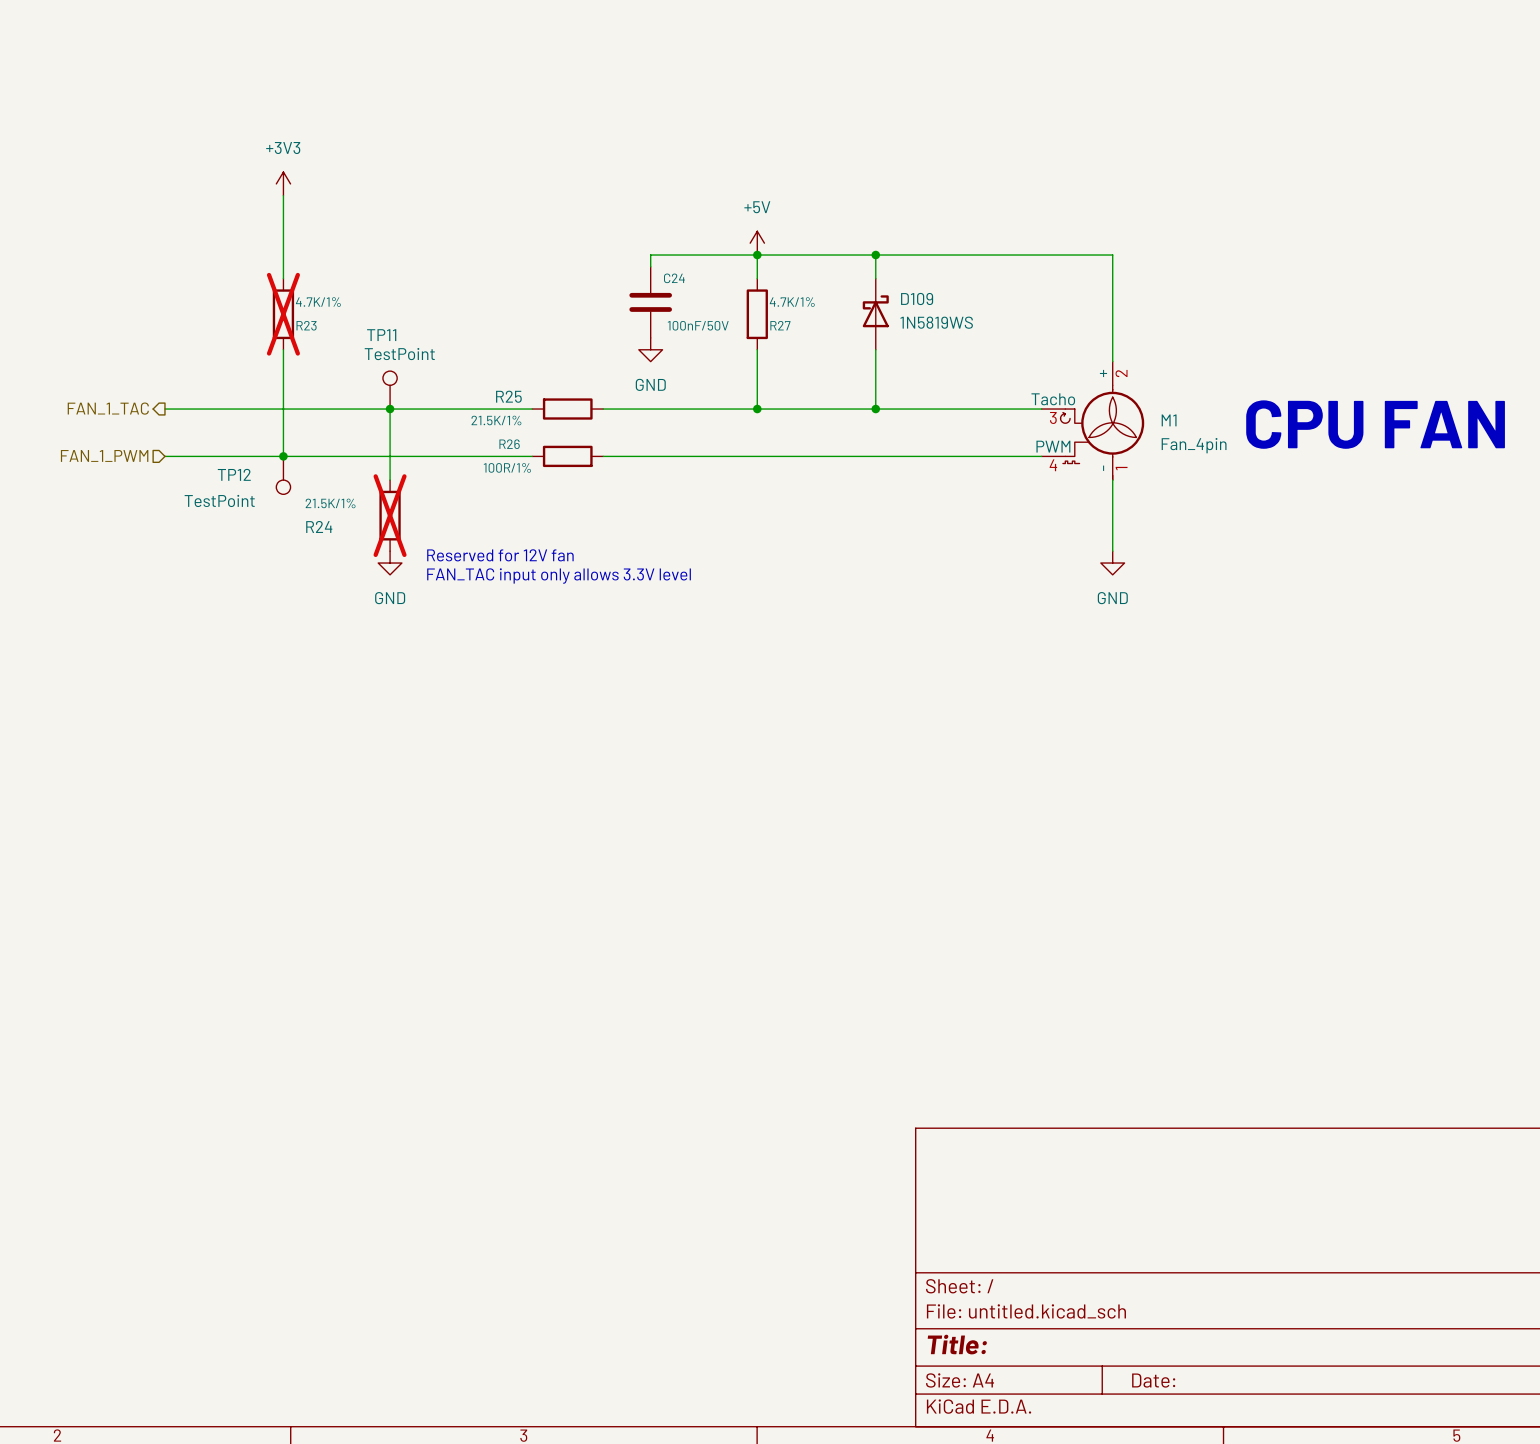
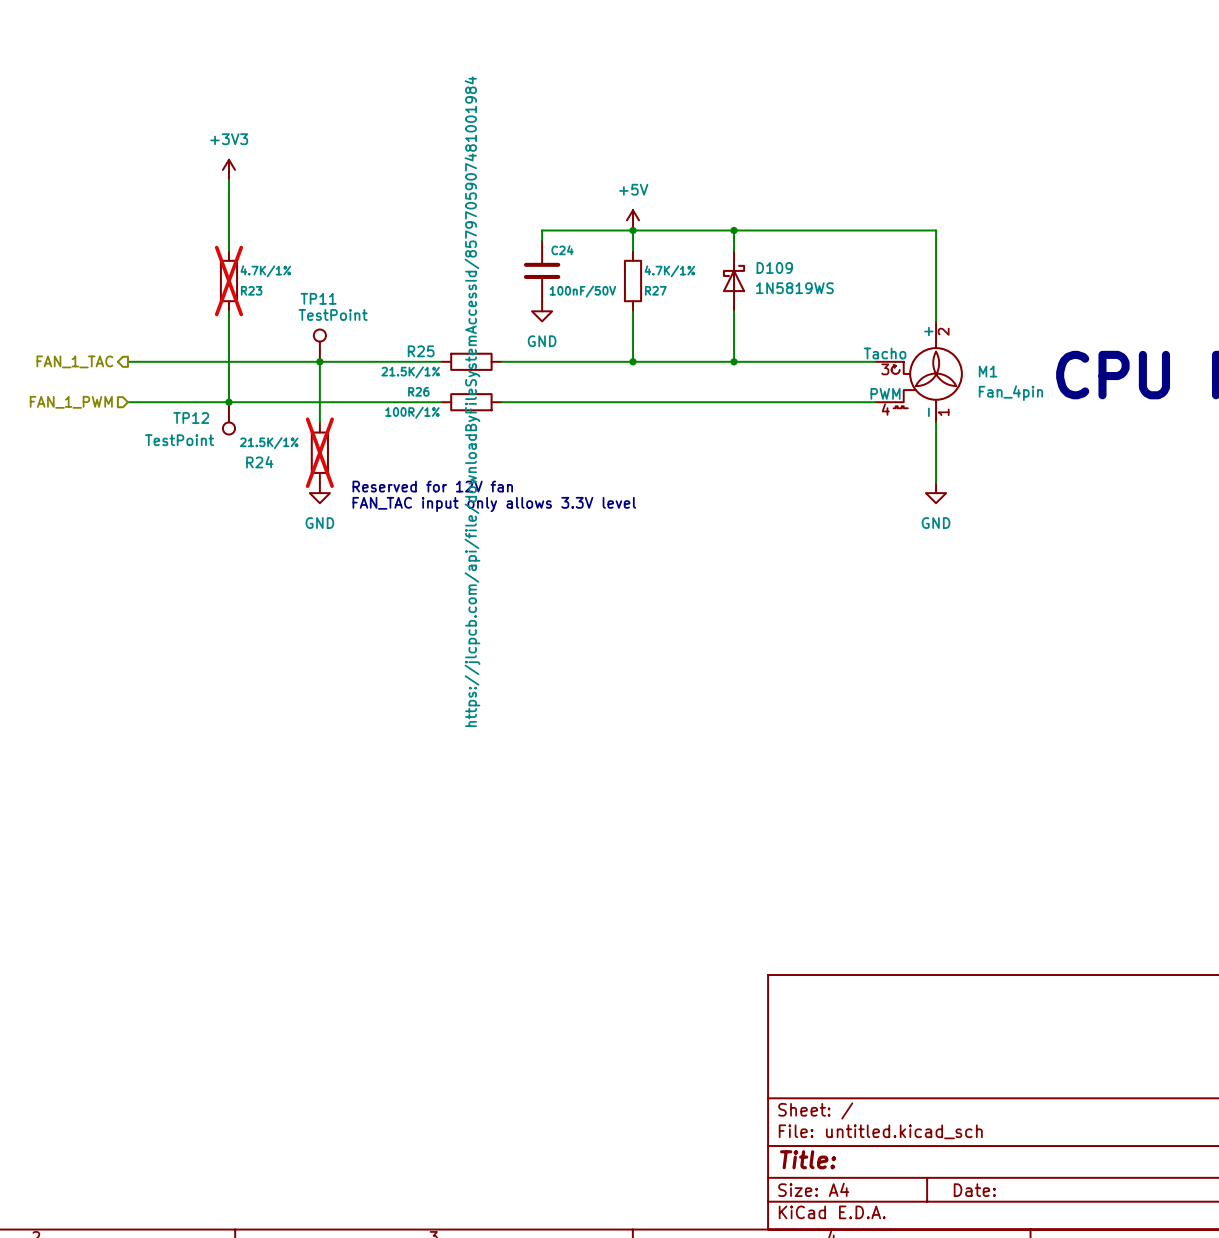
R26 text: none -> https://jlcpcb.com/api/file/downloadByFileSystemAccessId/8579705907481001984 (472, 401)

